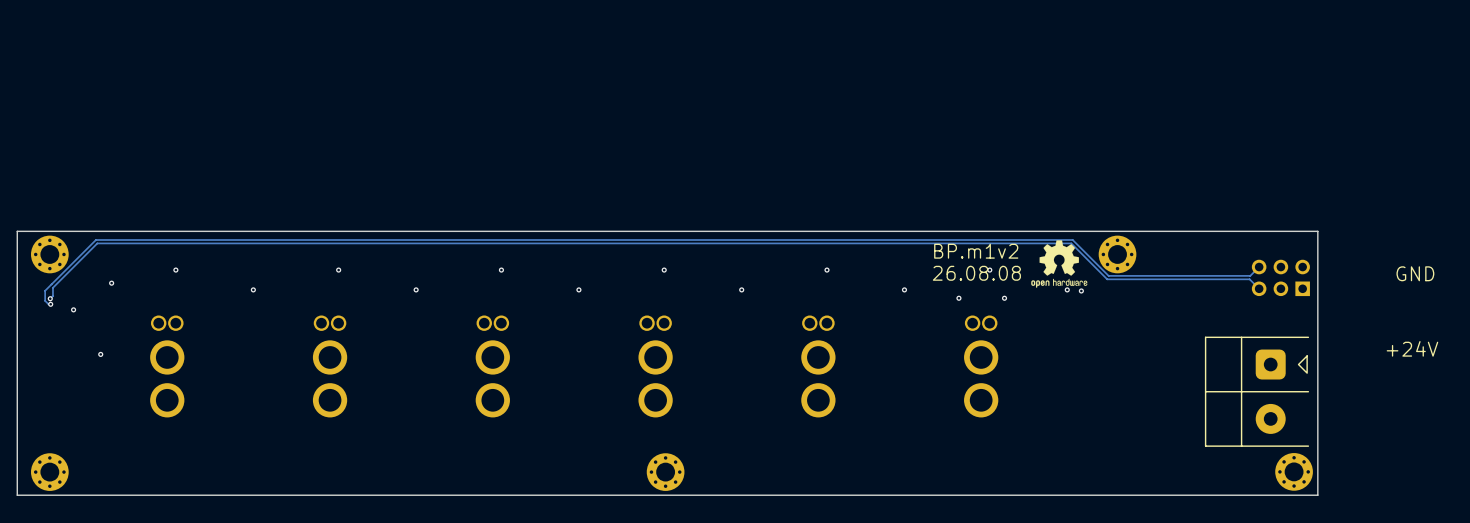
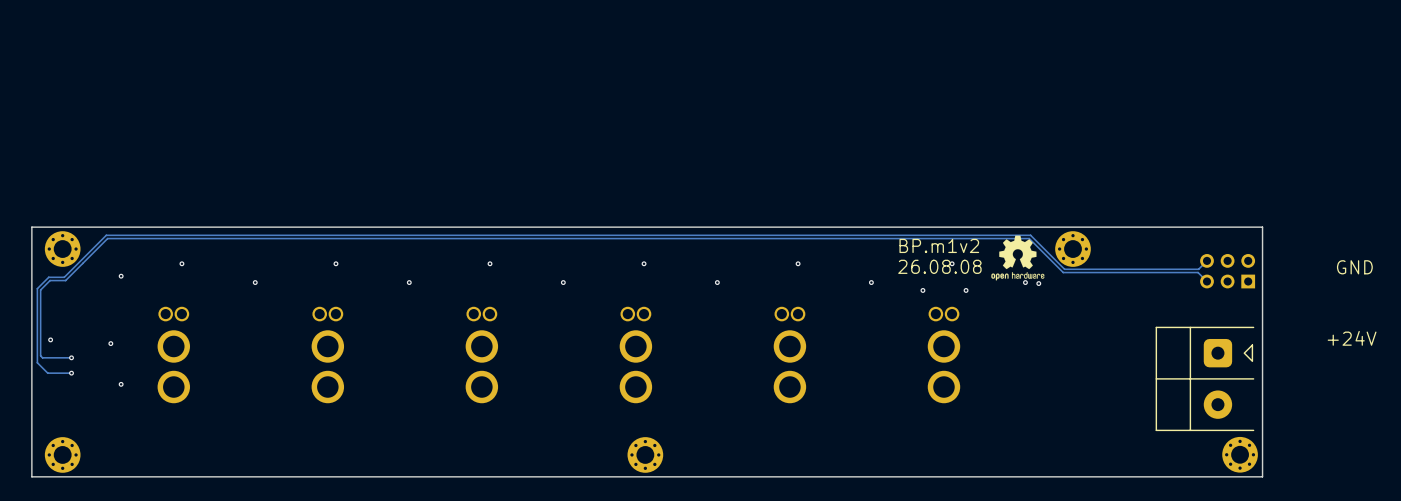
track: (51, 284) (45, 290) (45, 300) (50, 304) -> (64, 277) (48, 277) (37, 288) (37, 362) (47, 373) (71, 373)
track: (52, 287) (52, 296) (50, 298) -> (65, 280) (50, 280) (40, 290) (40, 355) (42, 357) (71, 357)
via: (50, 298) -> none
via: (50, 304) -> none
via: (73, 309) -> none
via: none -> (50, 339)
via: none -> (71, 357)
via: none -> (71, 373)
via: none -> (121, 384)

